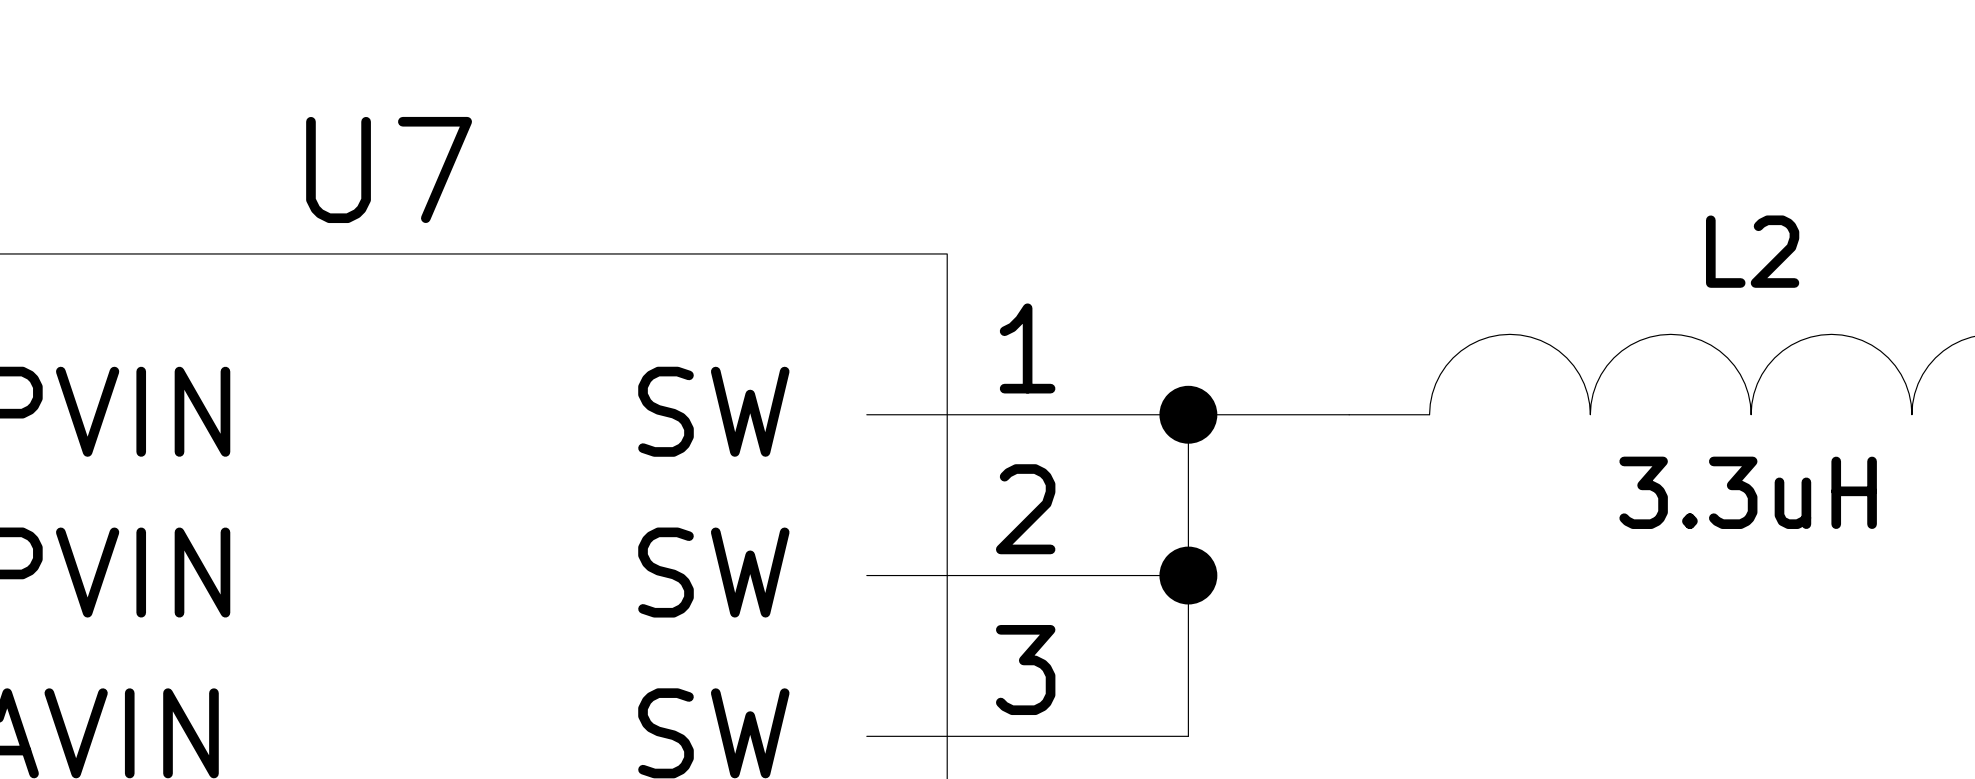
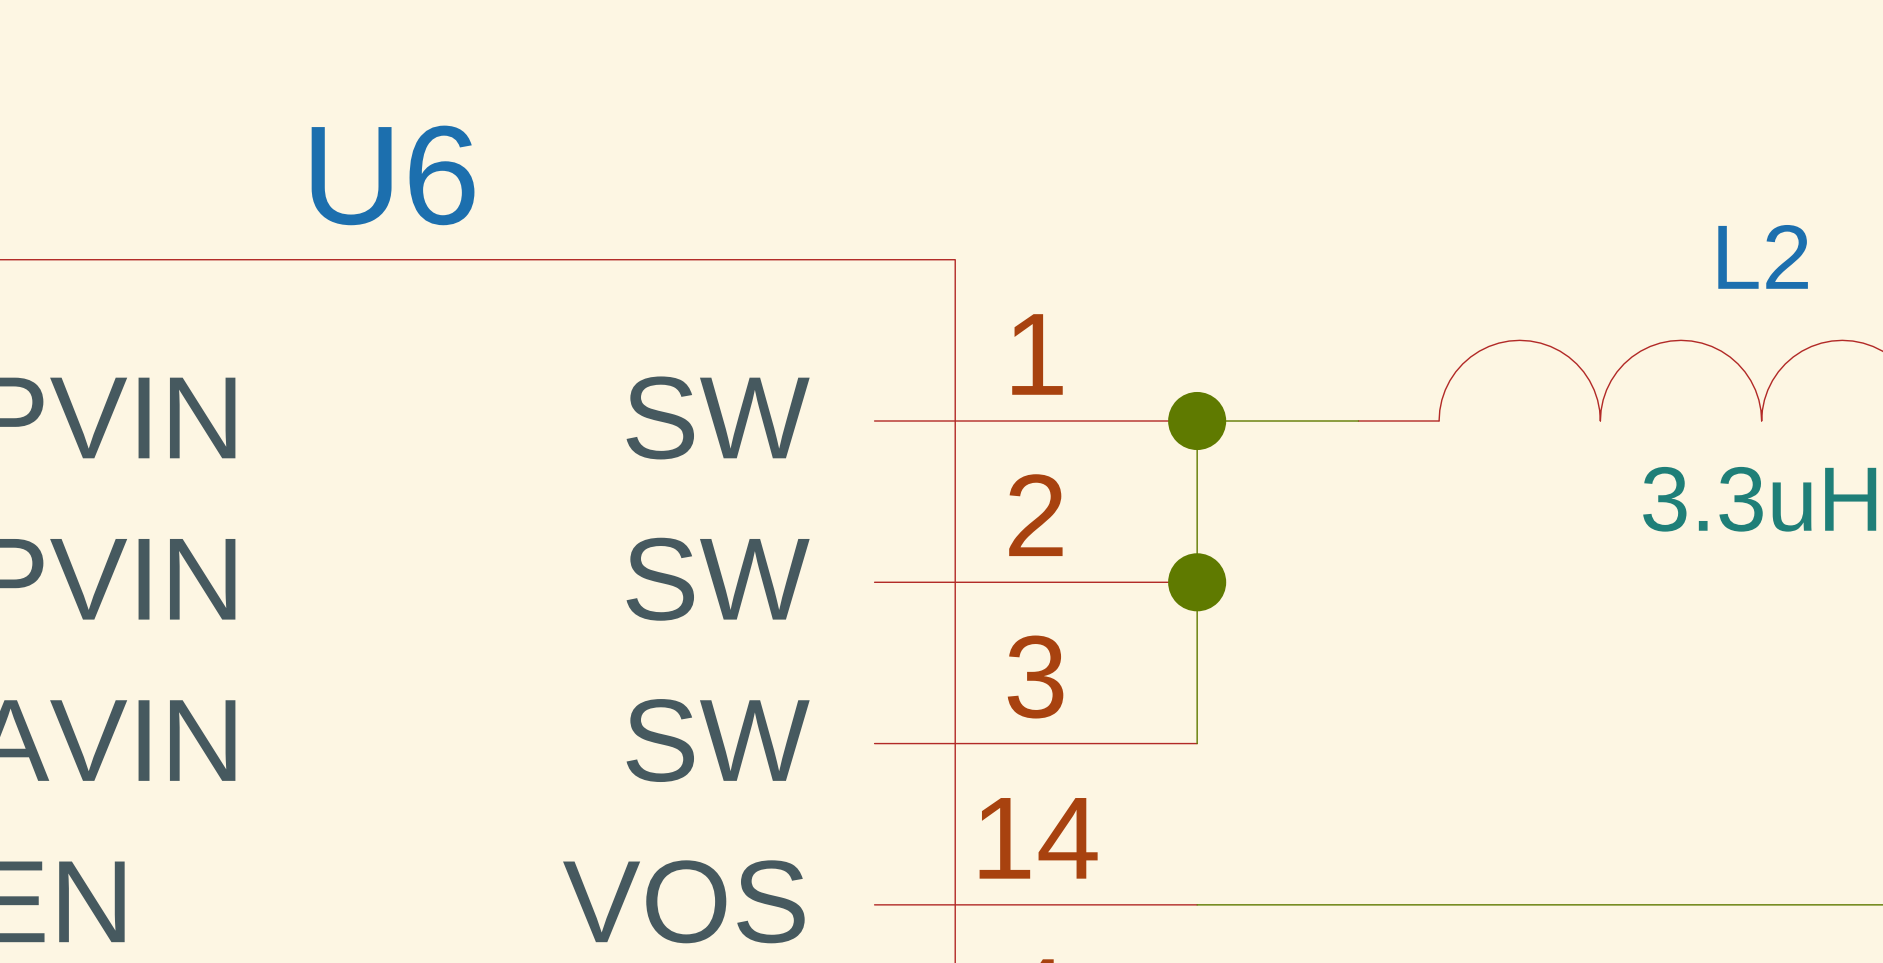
U7 name: U7 (389, 169) -> U6 (393, 175)

